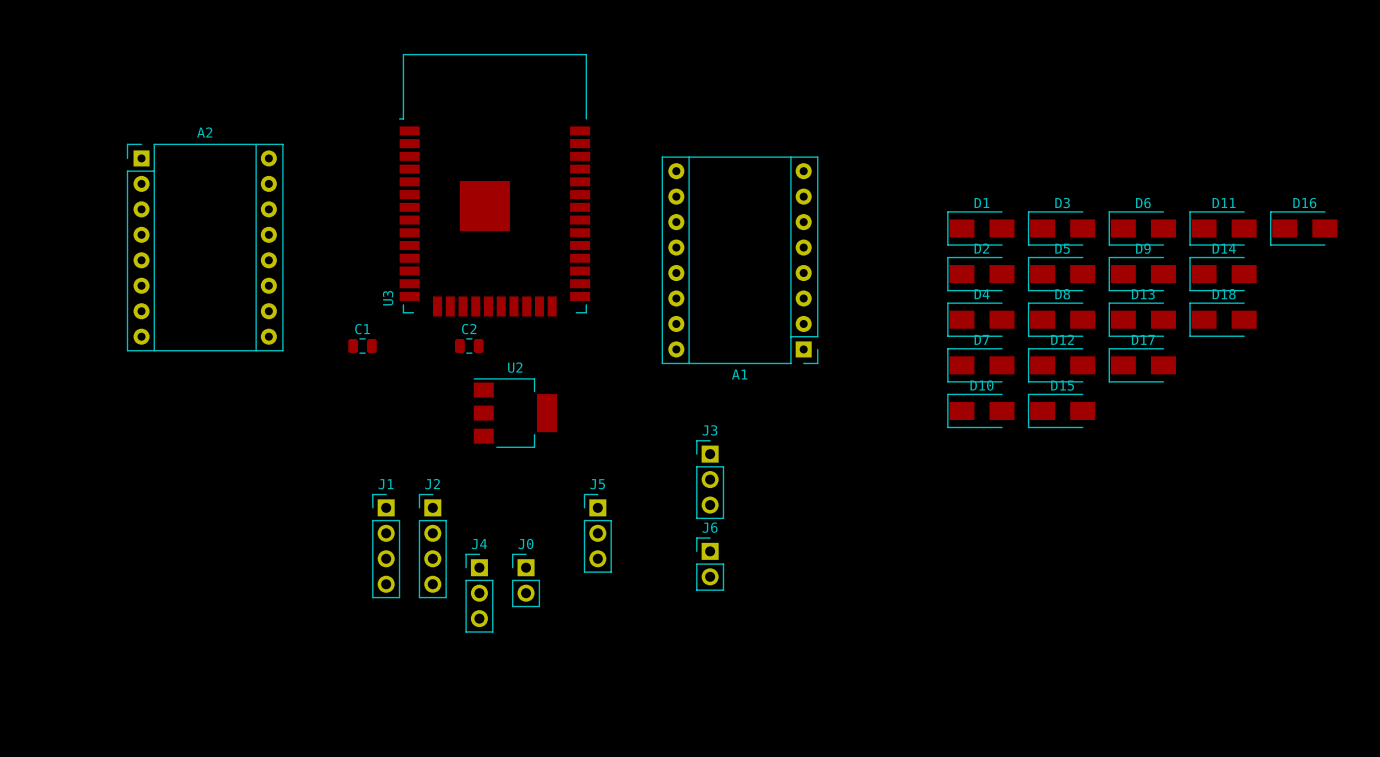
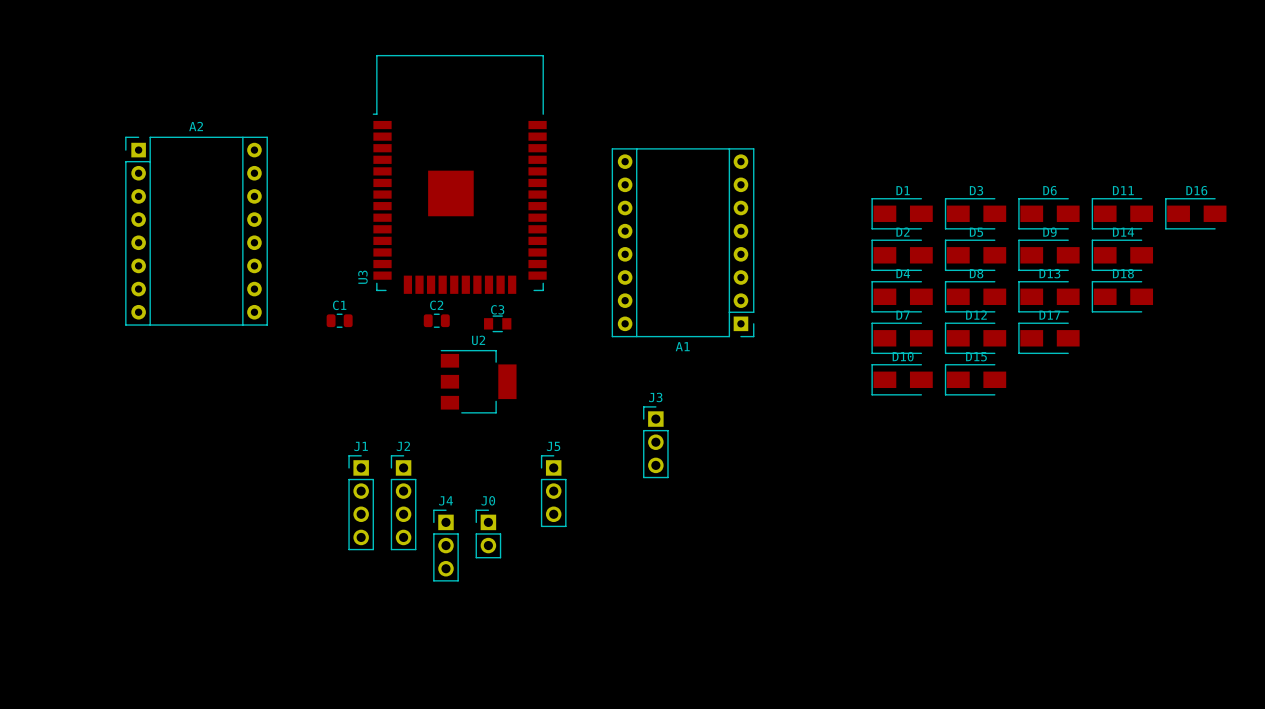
C3: none -> (497, 323)
J6: (710, 564) -> none

